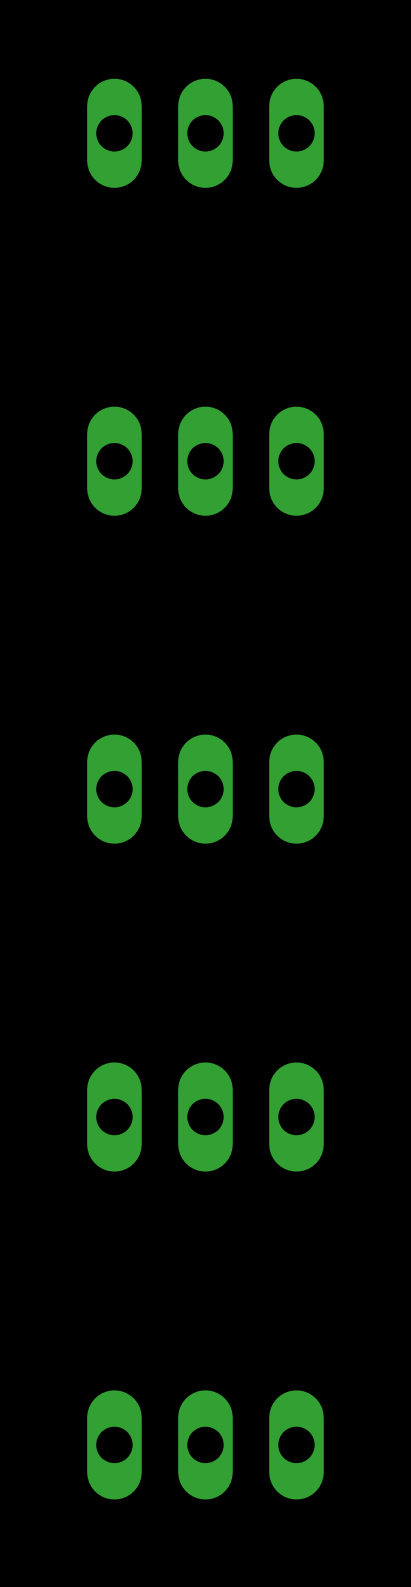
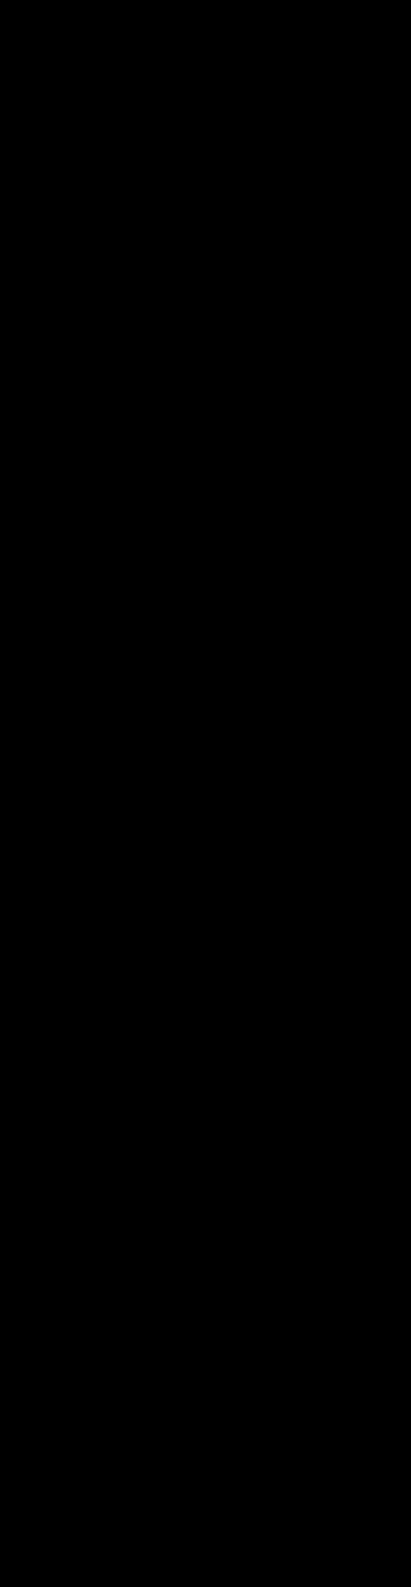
part: (205, 133) -> none
part: (205, 461) -> none
part: (205, 789) -> none
part: (205, 1117) -> none
part: (205, 1444) -> none

